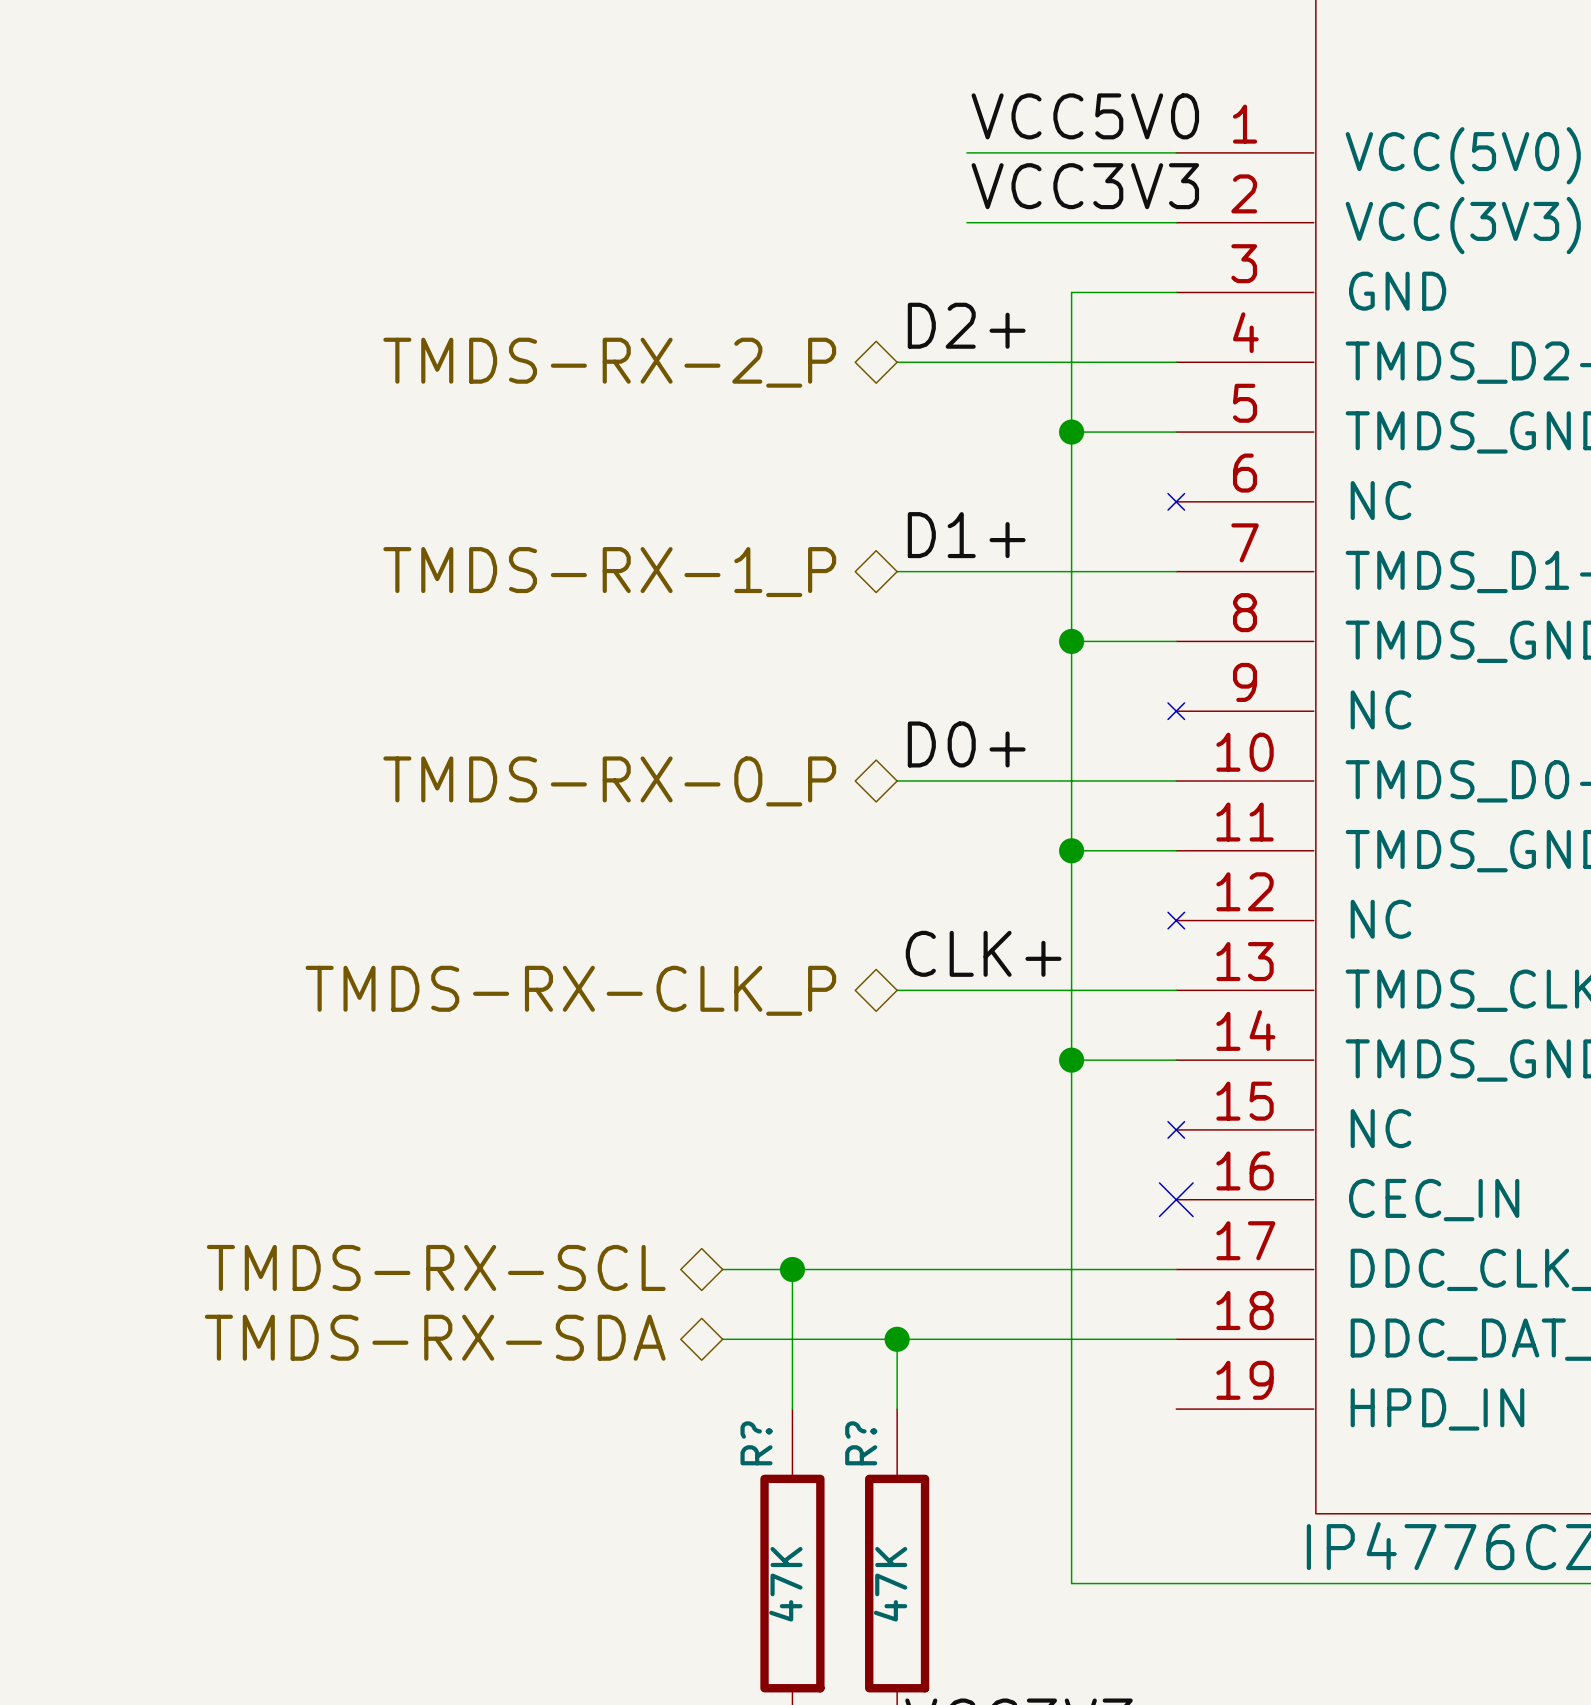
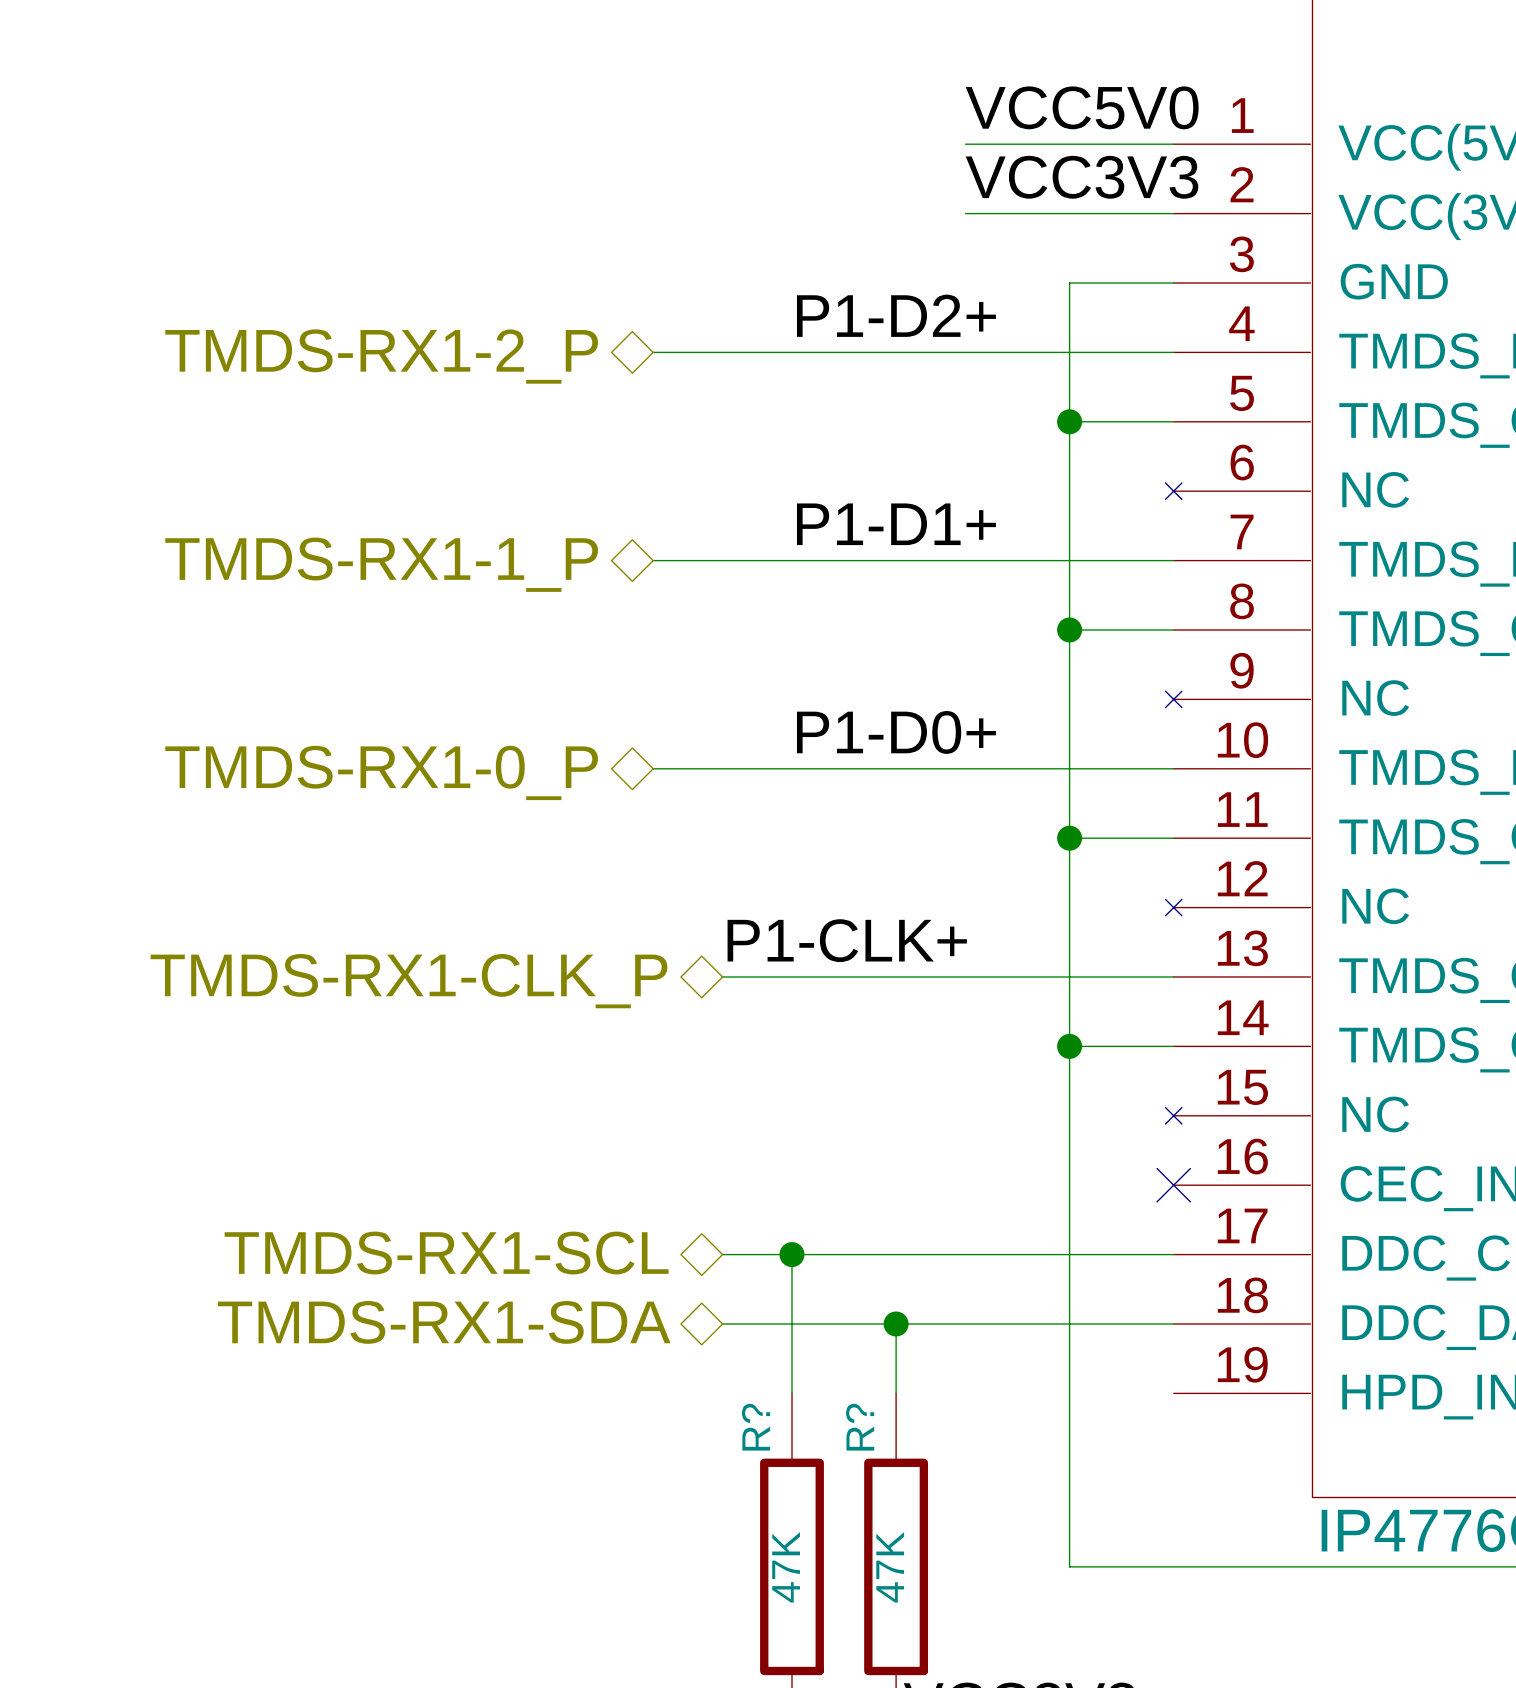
label: D2+ (966, 325) -> P1-D2+ (896, 315)
hierarchical label: TMDS-RX-2_P (609, 362) -> TMDS-RX1-2_P (381, 356)
wire: none -> (653, 352) (896, 352)
label: D1+ (966, 535) -> P1-D1+ (896, 524)
wire: none -> (653, 560) (896, 560)
hierarchical label: TMDS-RX-1_P (609, 572) -> TMDS-RX1-1_P (381, 564)
label: D0+ (966, 744) -> P1-D0+ (896, 732)
hierarchical label: TMDS-RX-0_P (609, 781) -> TMDS-RX1-0_P (381, 772)
wire: none -> (653, 768) (896, 768)
label: CLK+ (983, 953) -> P1-CLK+ (847, 940)
hierarchical label: TMDS-RX-CLK_P (570, 990) -> TMDS-RX1-CLK_P (408, 981)
wire: none -> (722, 976) (896, 976)
hierarchical label: TMDS-RX-SCL (436, 1267) -> TMDS-RX1-SCL (446, 1253)
hierarchical label: TMDS-RX-SDA (435, 1337) -> TMDS-RX1-SDA (444, 1322)

